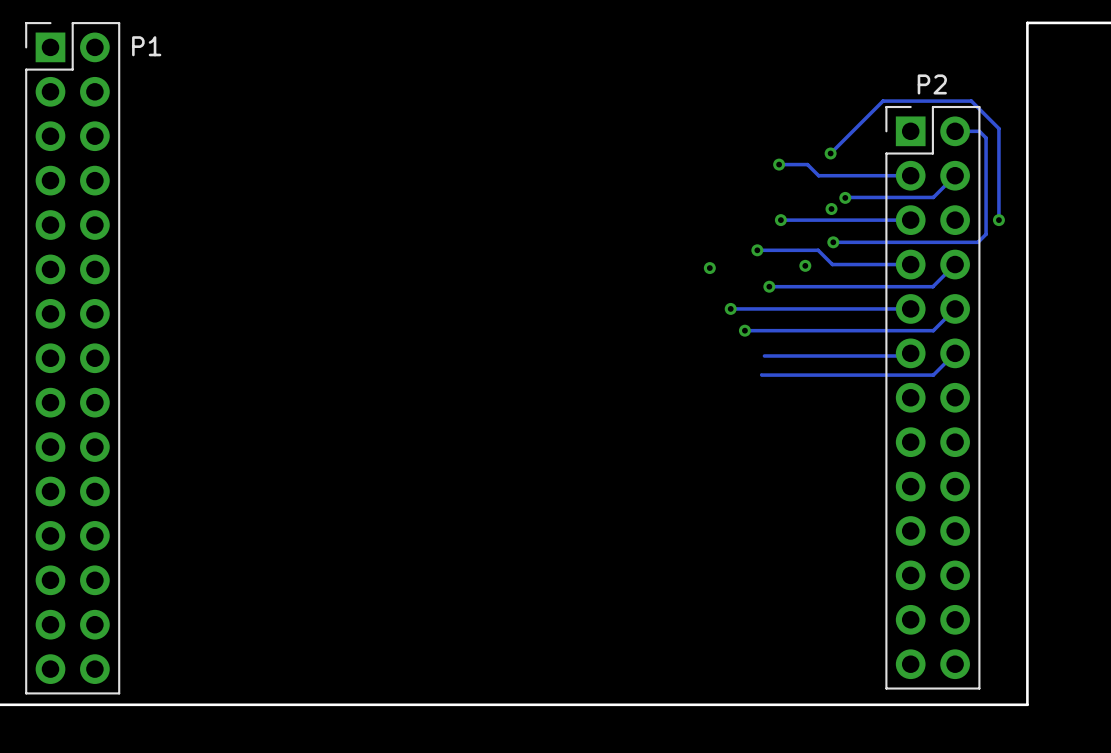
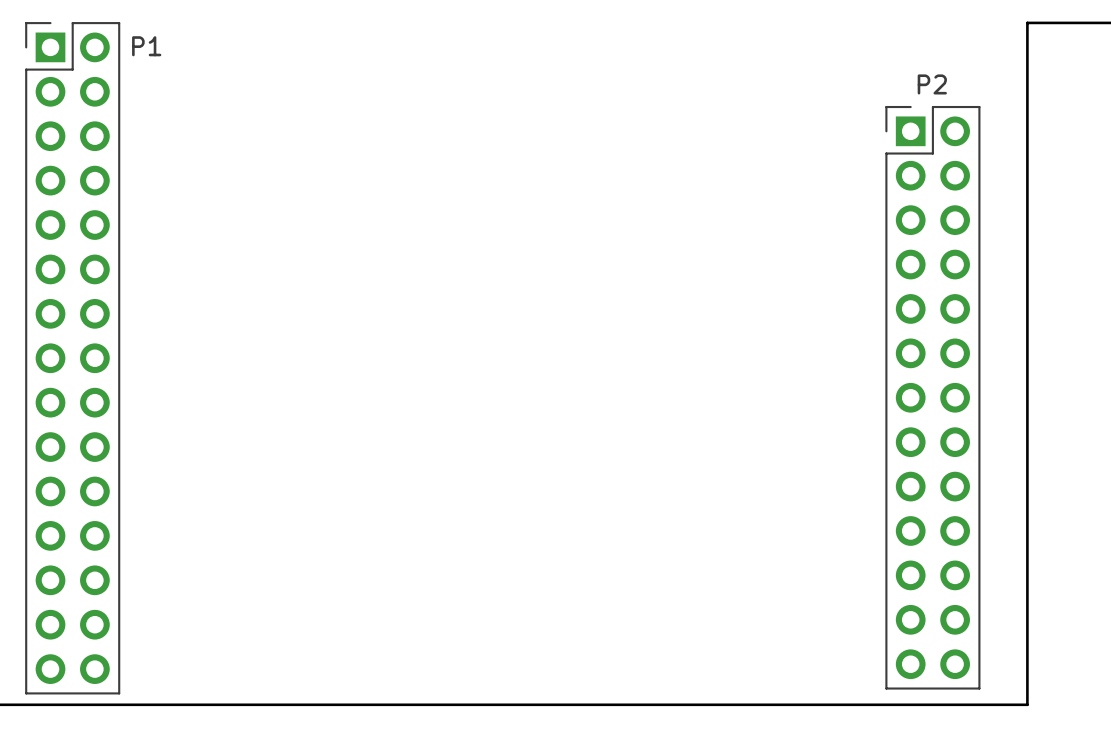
track: (955, 131) (979, 131) (986, 137) (986, 234) (978, 242) (832, 242) -> none
track: (830, 153) (883, 101) (971, 101) (998, 128) (998, 220) -> none
via: (830, 153) -> none
track: (779, 164) (807, 164) (818, 175) (910, 175) -> none
via: (779, 164) -> none
track: (955, 175) (933, 197) (845, 197) -> none
via: (845, 197) -> none
via: (831, 209) -> none
via: (780, 220) -> none
track: (910, 220) (780, 220) -> none
via: (998, 220) -> none
via: (833, 242) -> none
track: (757, 250) (818, 250) (832, 264) (910, 264) -> none
via: (757, 250) -> none
track: (955, 264) (932, 286) (769, 286) -> none
via: (805, 265) -> none
via: (709, 268) -> none
via: (769, 286) -> none
via: (730, 308) -> none
track: (910, 308) (730, 308) -> none
track: (955, 308) (933, 330) (744, 330) -> none
via: (744, 330) -> none
track: (910, 353) (908, 355) (764, 355) -> none
track: (955, 353) (933, 375) (761, 374) -> none

